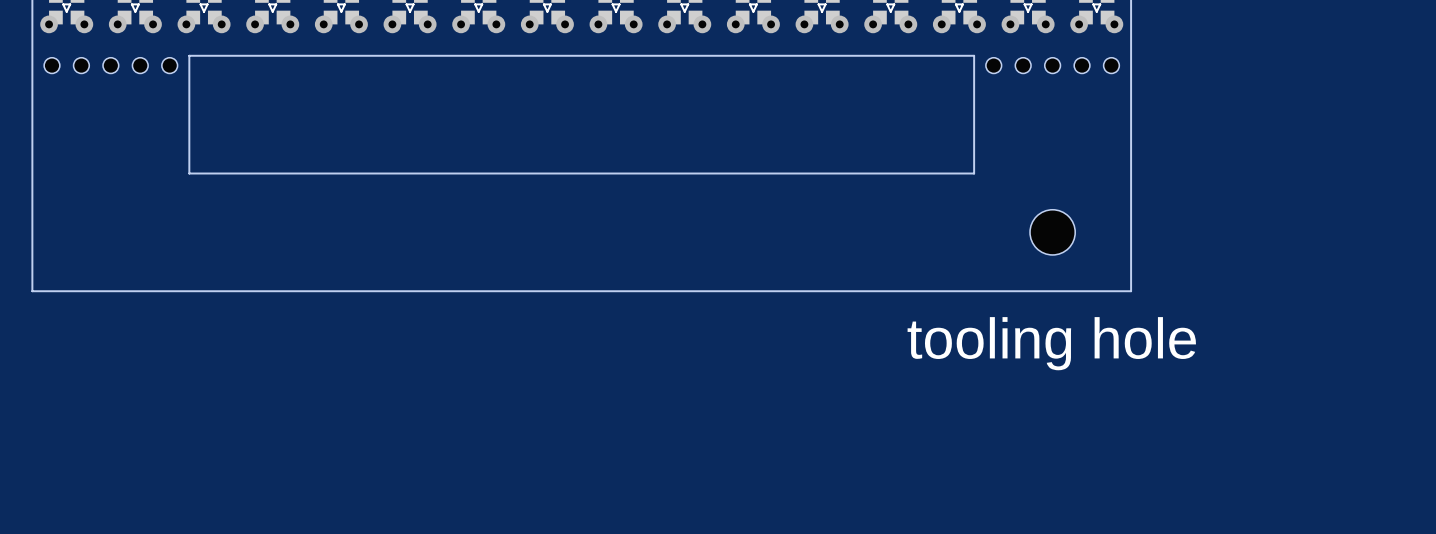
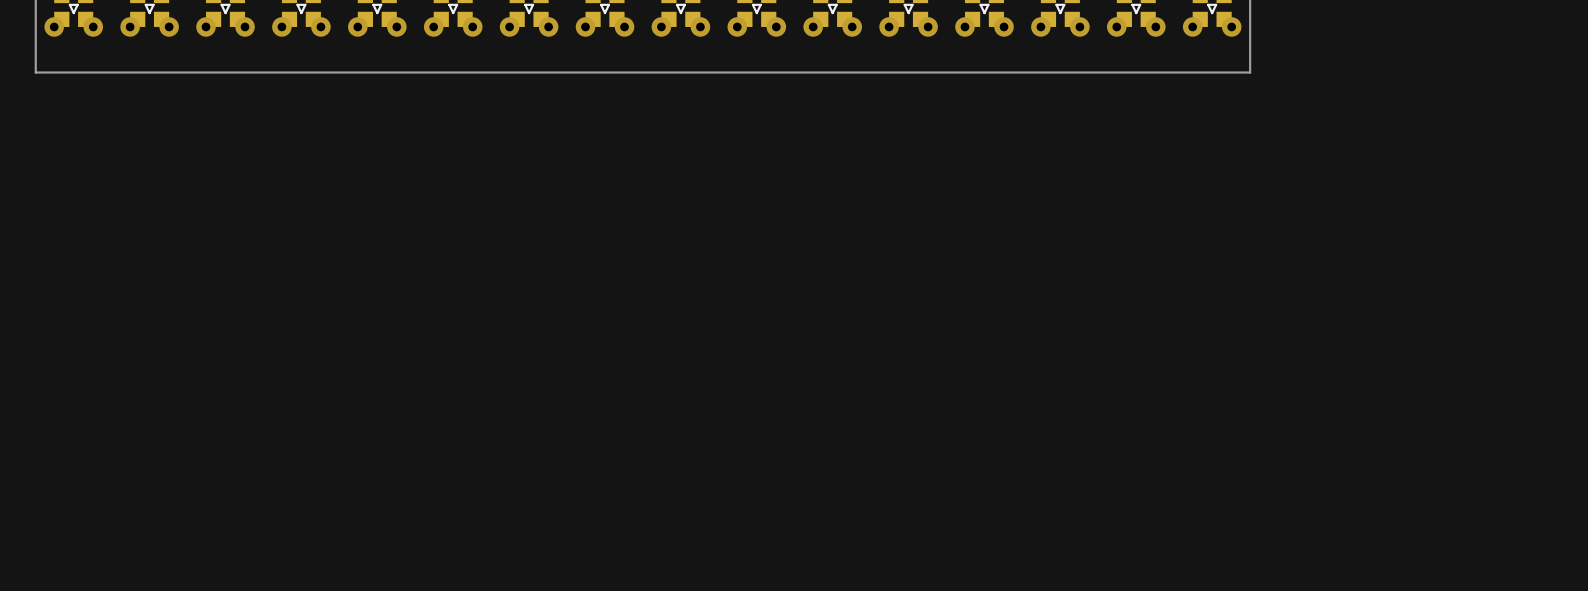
board edge: (189, 55) (189, 173) (974, 173) (974, 55) (189, 55) -> none
board edge: (32, 65) (32, 291) (1131, 291) (1131, 65) -> (35, 72) (1250, 72)
part: (51, 65) -> none
part: (81, 65) -> none
part: (110, 65) -> none
part: (140, 65) -> none
part: (169, 65) -> none
part: (993, 65) -> none
part: (1023, 65) -> none
part: (1052, 65) -> none
part: (1082, 65) -> none
part: (1111, 65) -> none
part: (1052, 232) -> none

